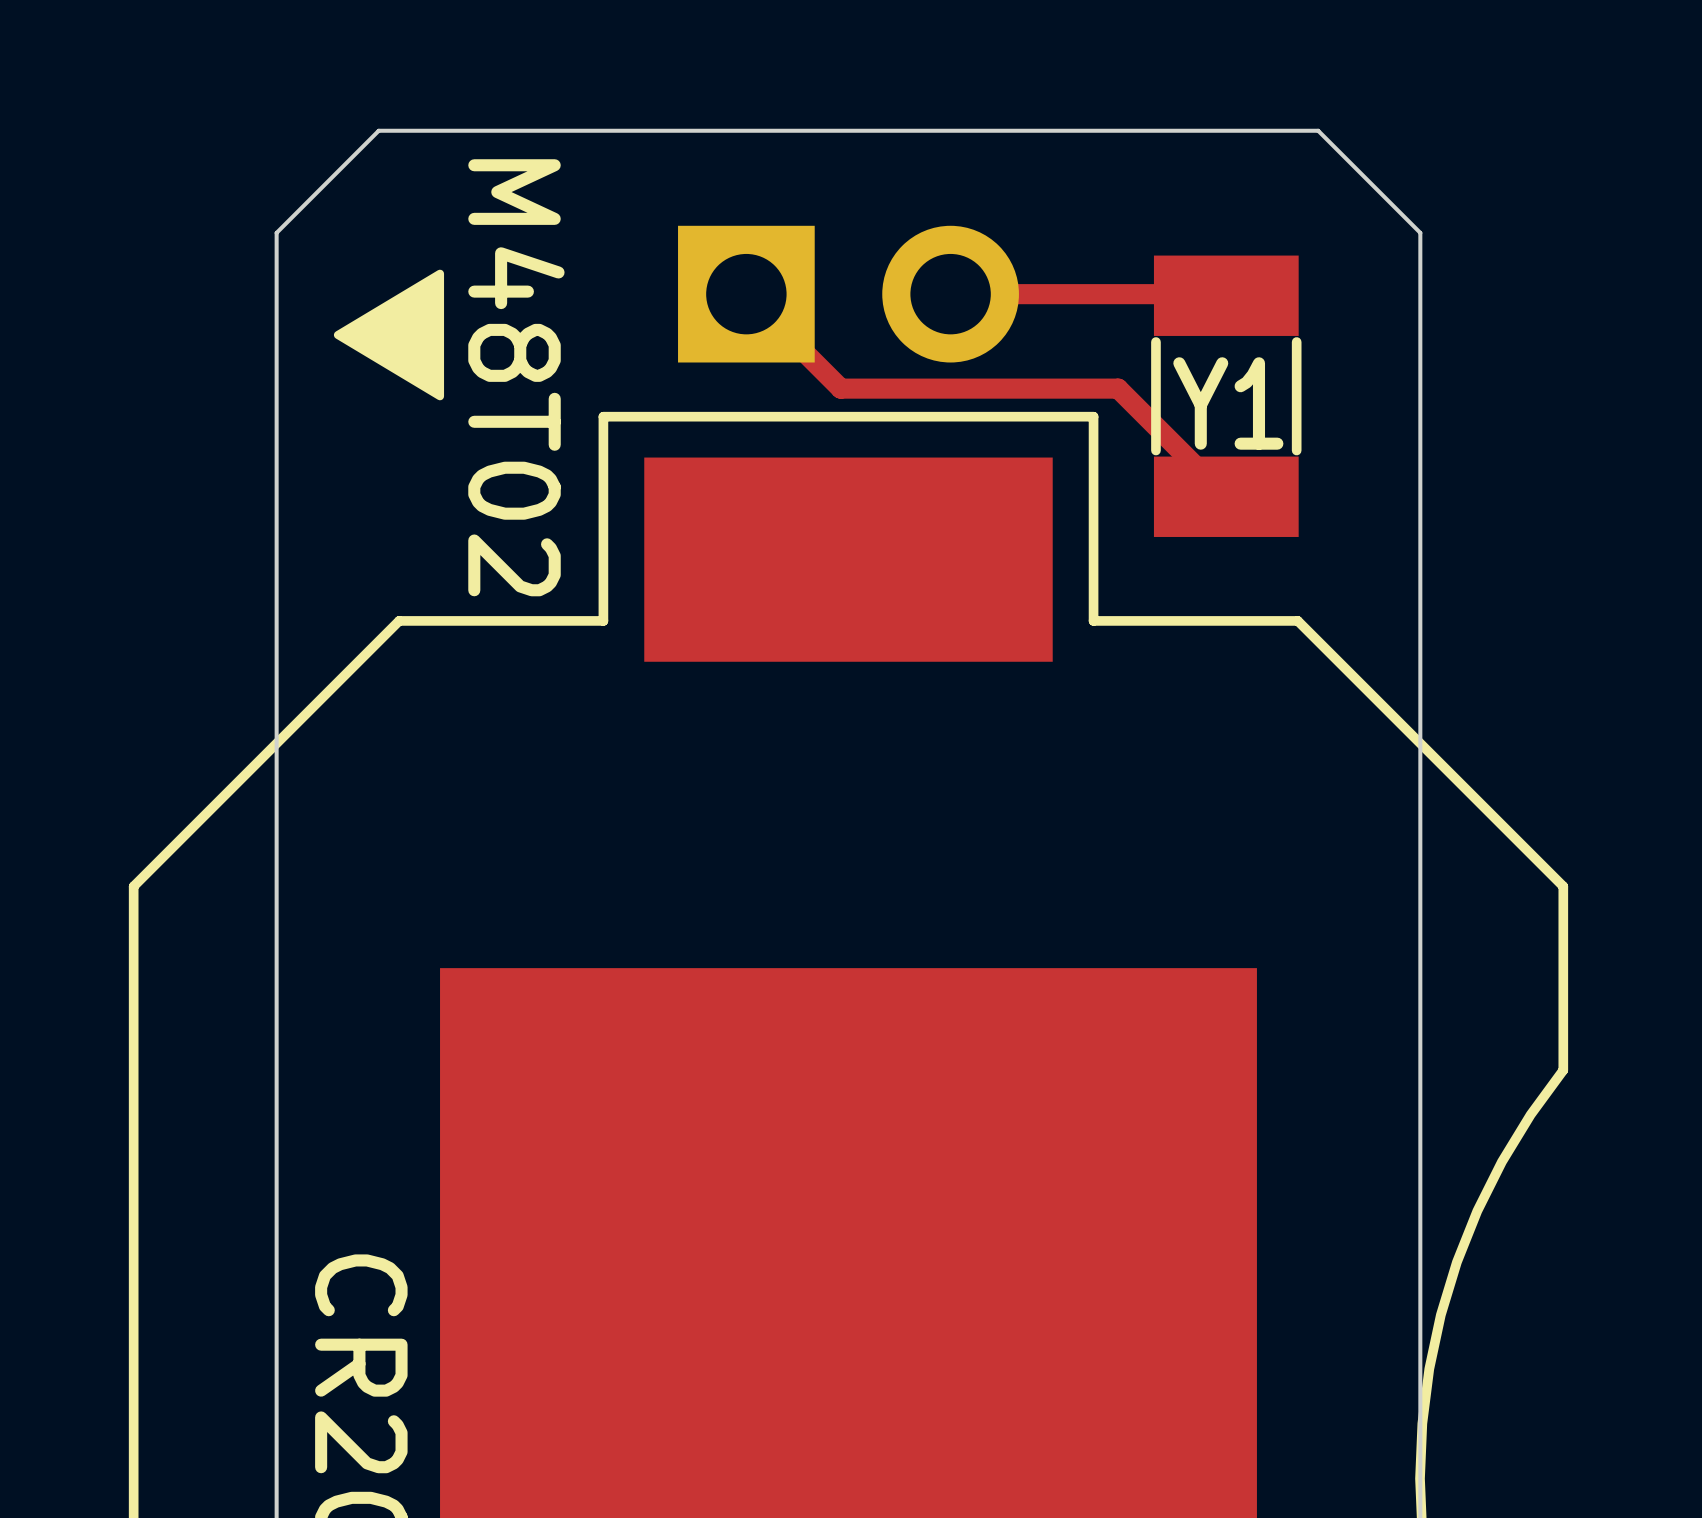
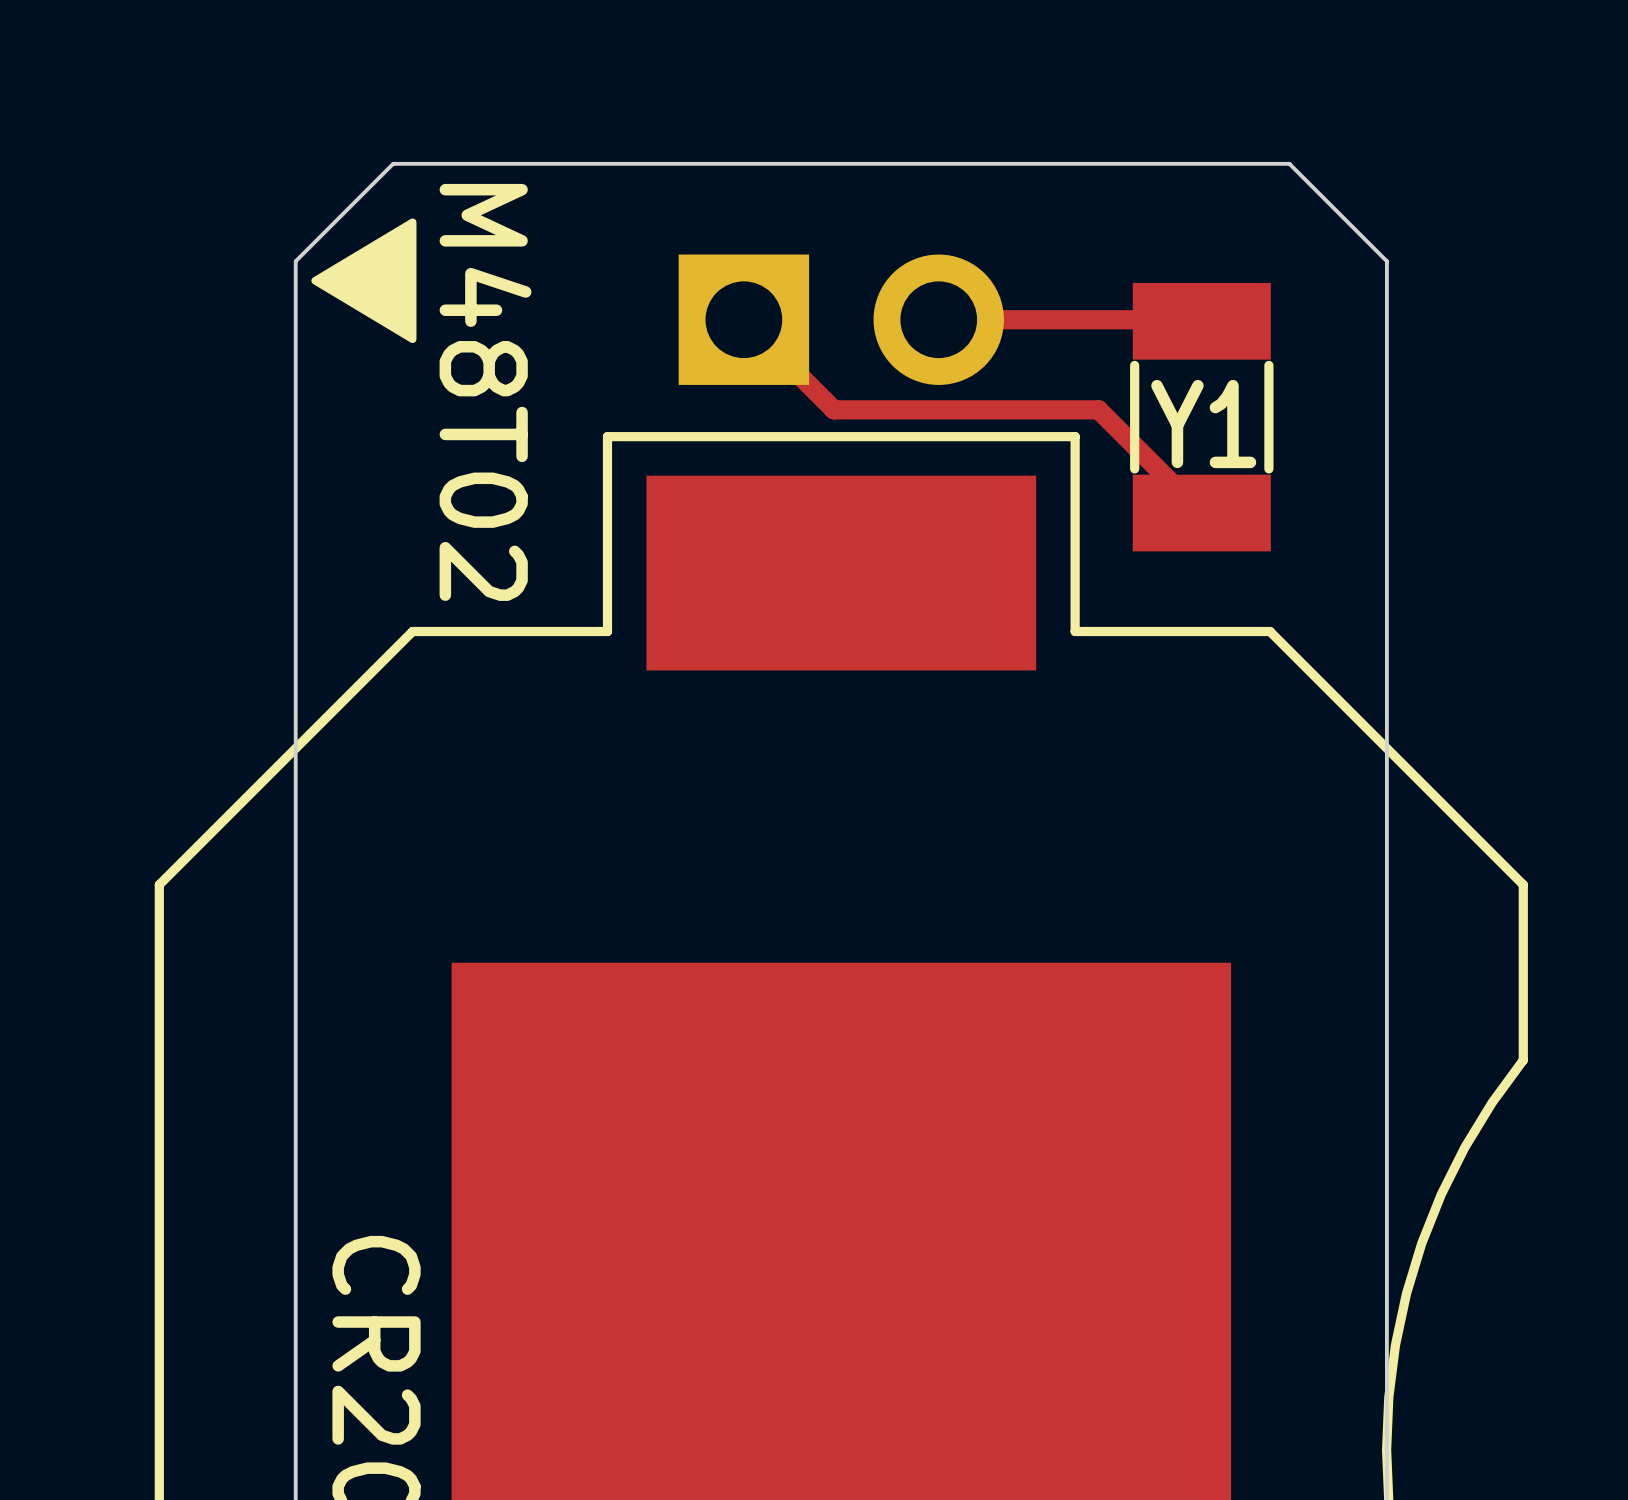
drawing position: (388, 334) -> (363, 280)
text position: M48T02 (516, 377) -> M48T02 (485, 392)

